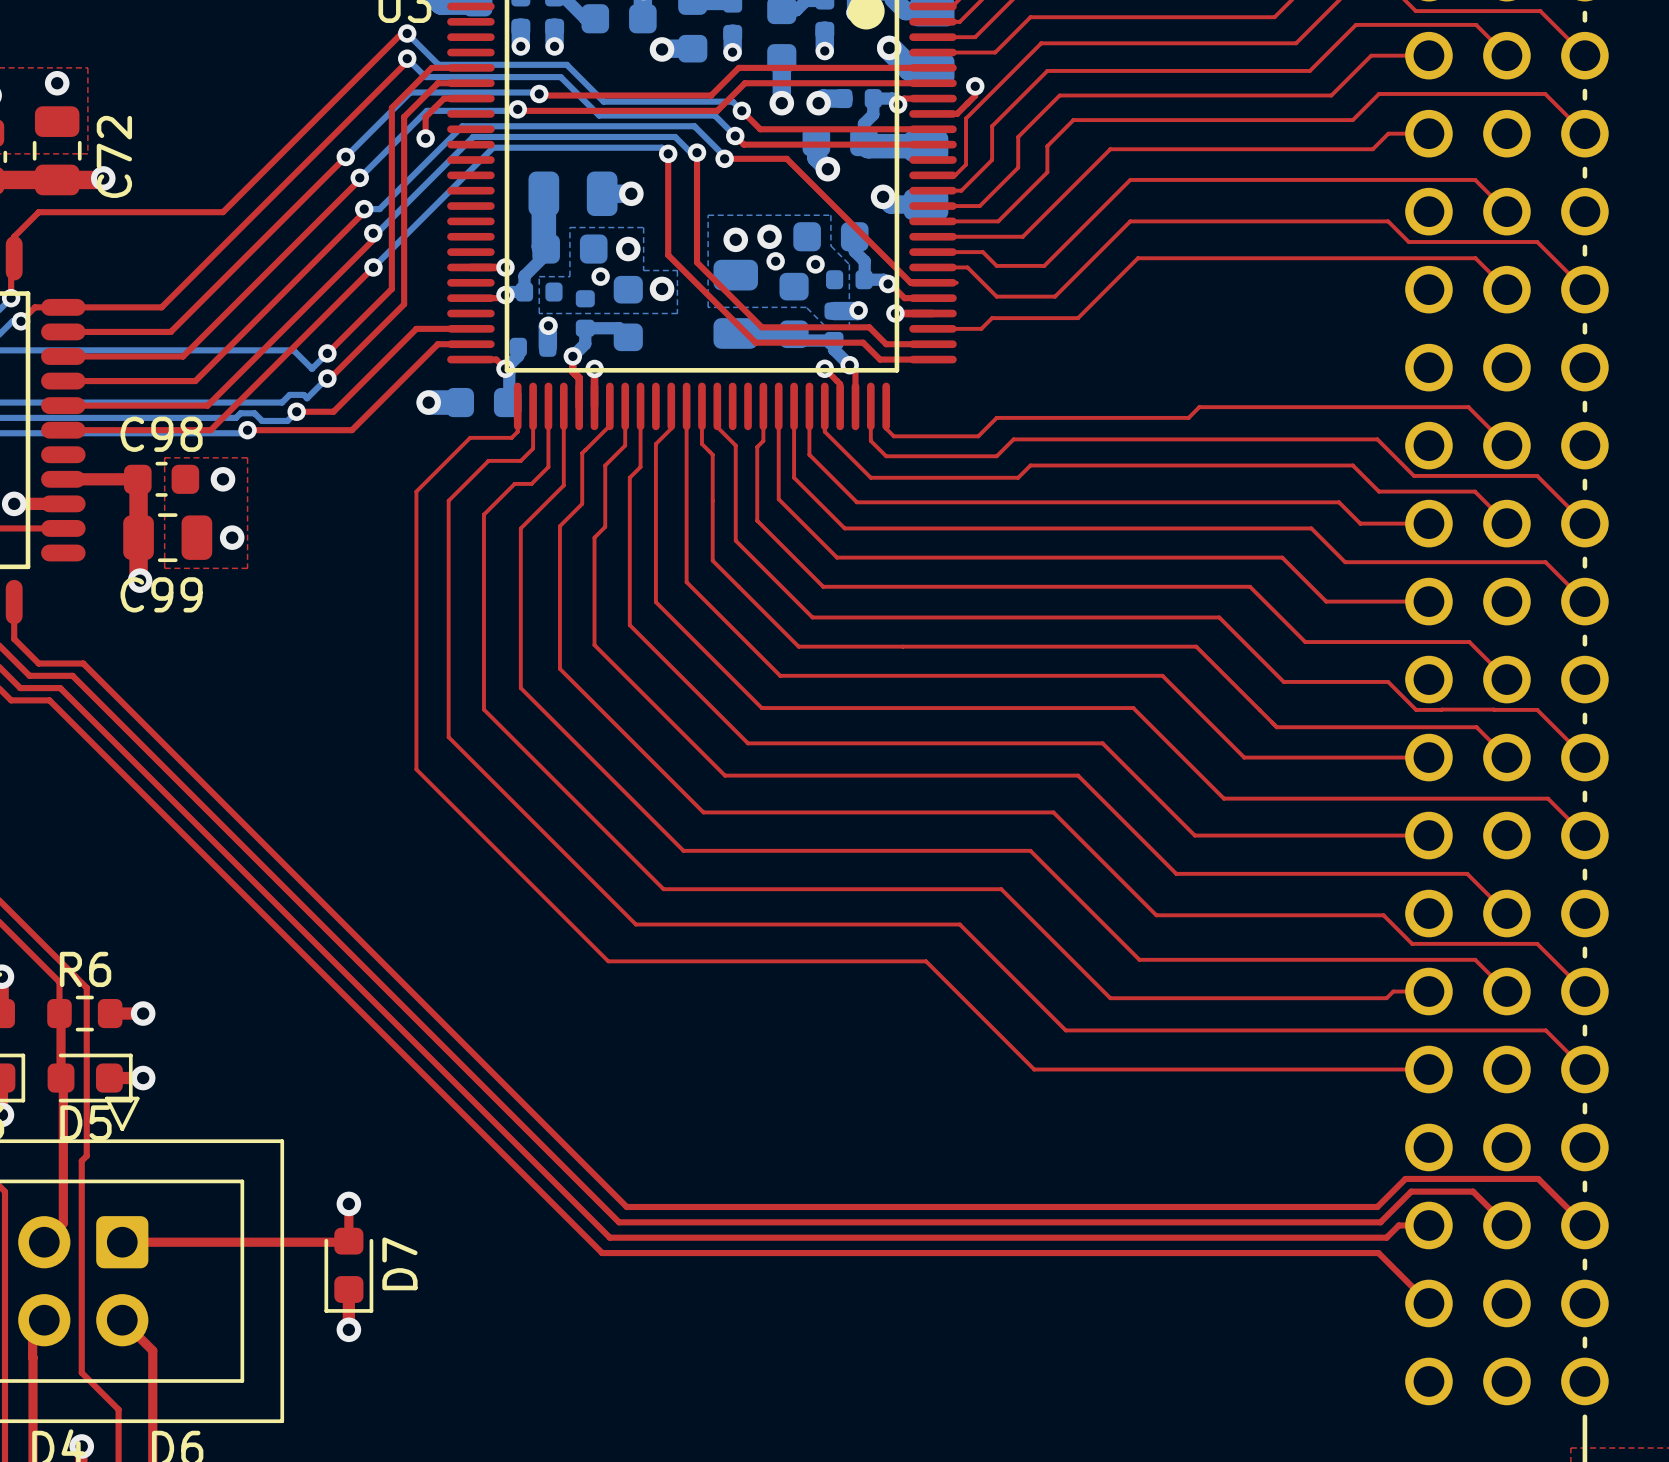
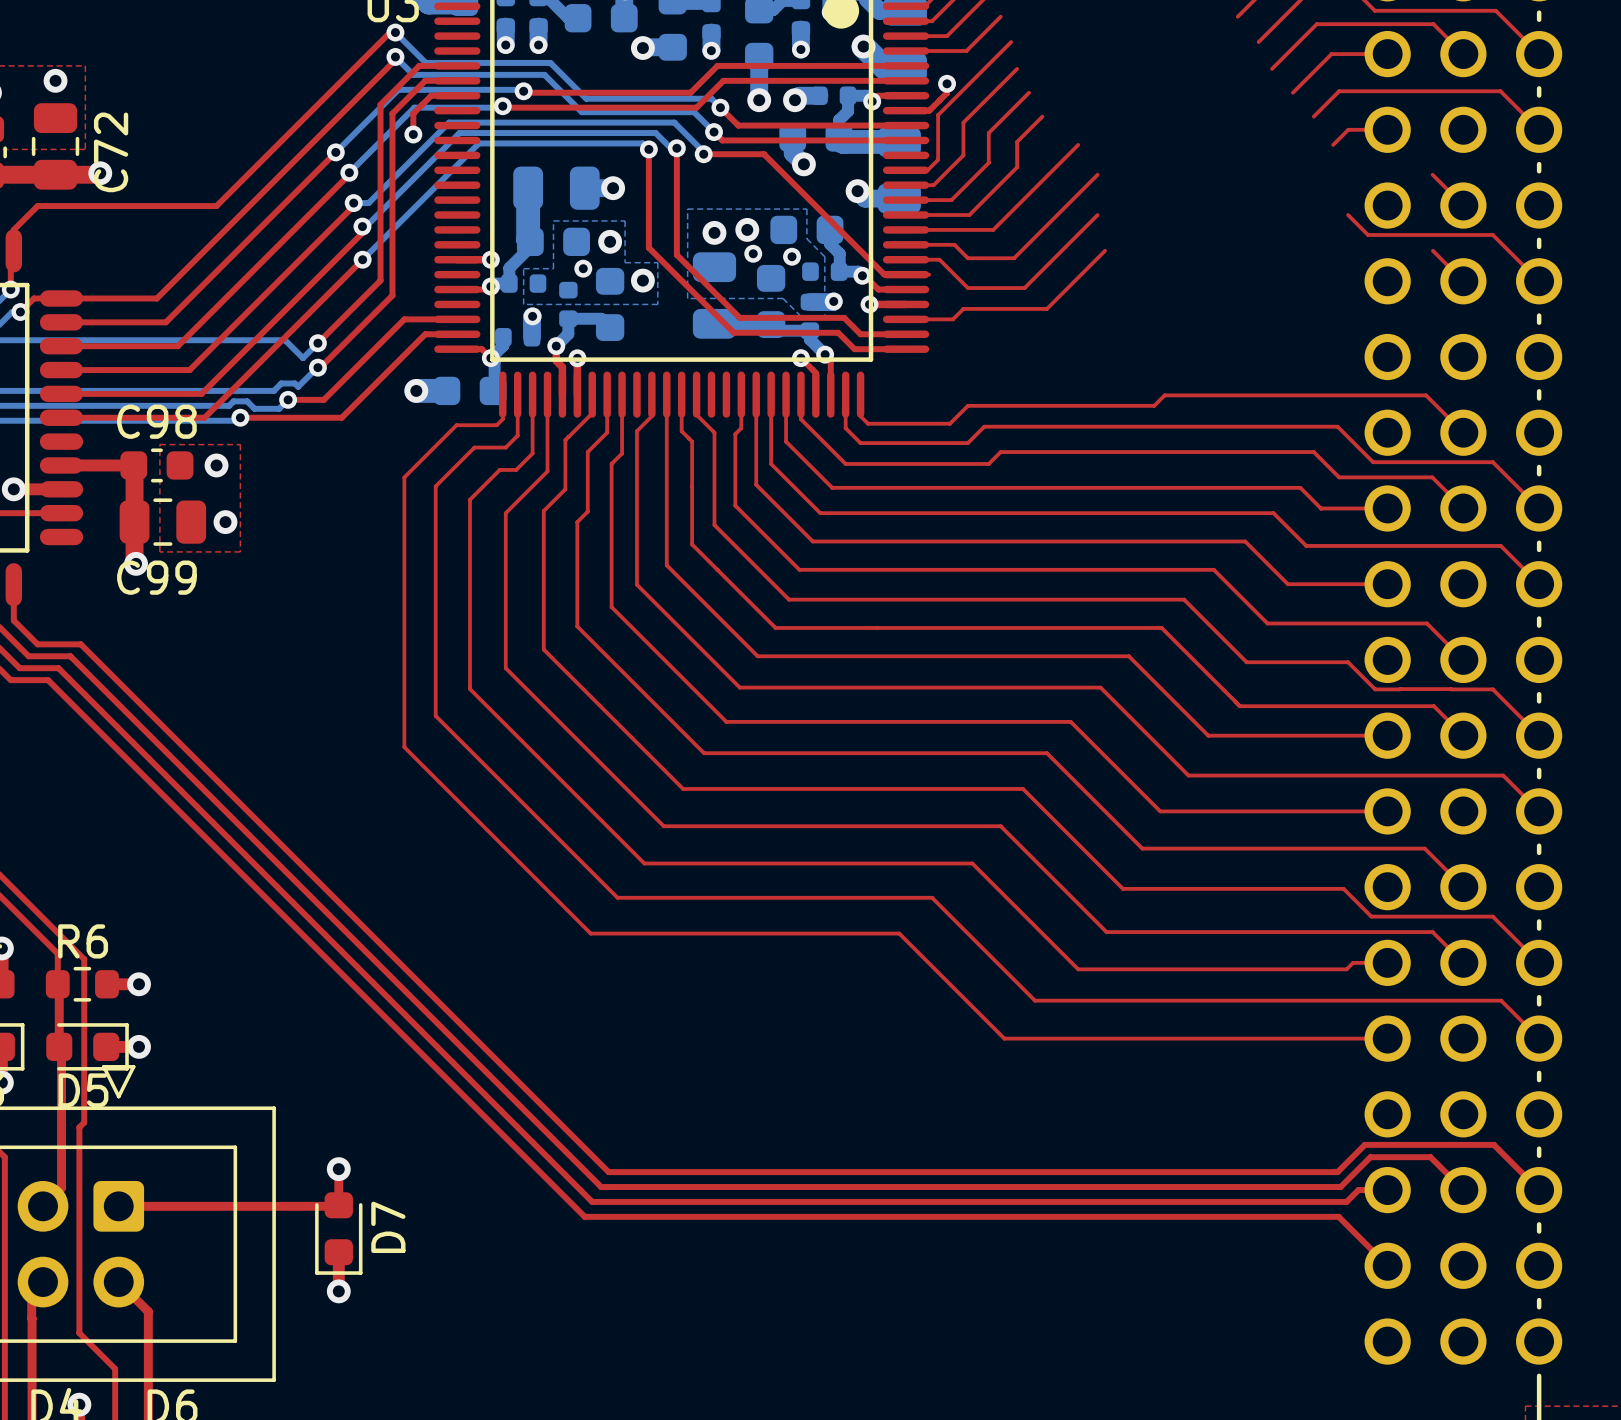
top track: (1030, 17) (1274, 17) -> none
top track: (1041, 43) (1296, 43) -> none
top track: (1047, 70) (1309, 70) -> none
top track: (1059, 95) (1331, 95) -> none
top track: (1073, 120) (1352, 120) -> none
top track: (1110, 149) (1372, 149) -> none
top track: (1130, 179) (1475, 179) -> none
top track: (1130, 221) (1388, 221) -> none
top track: (1137, 258) (1475, 258) -> none

